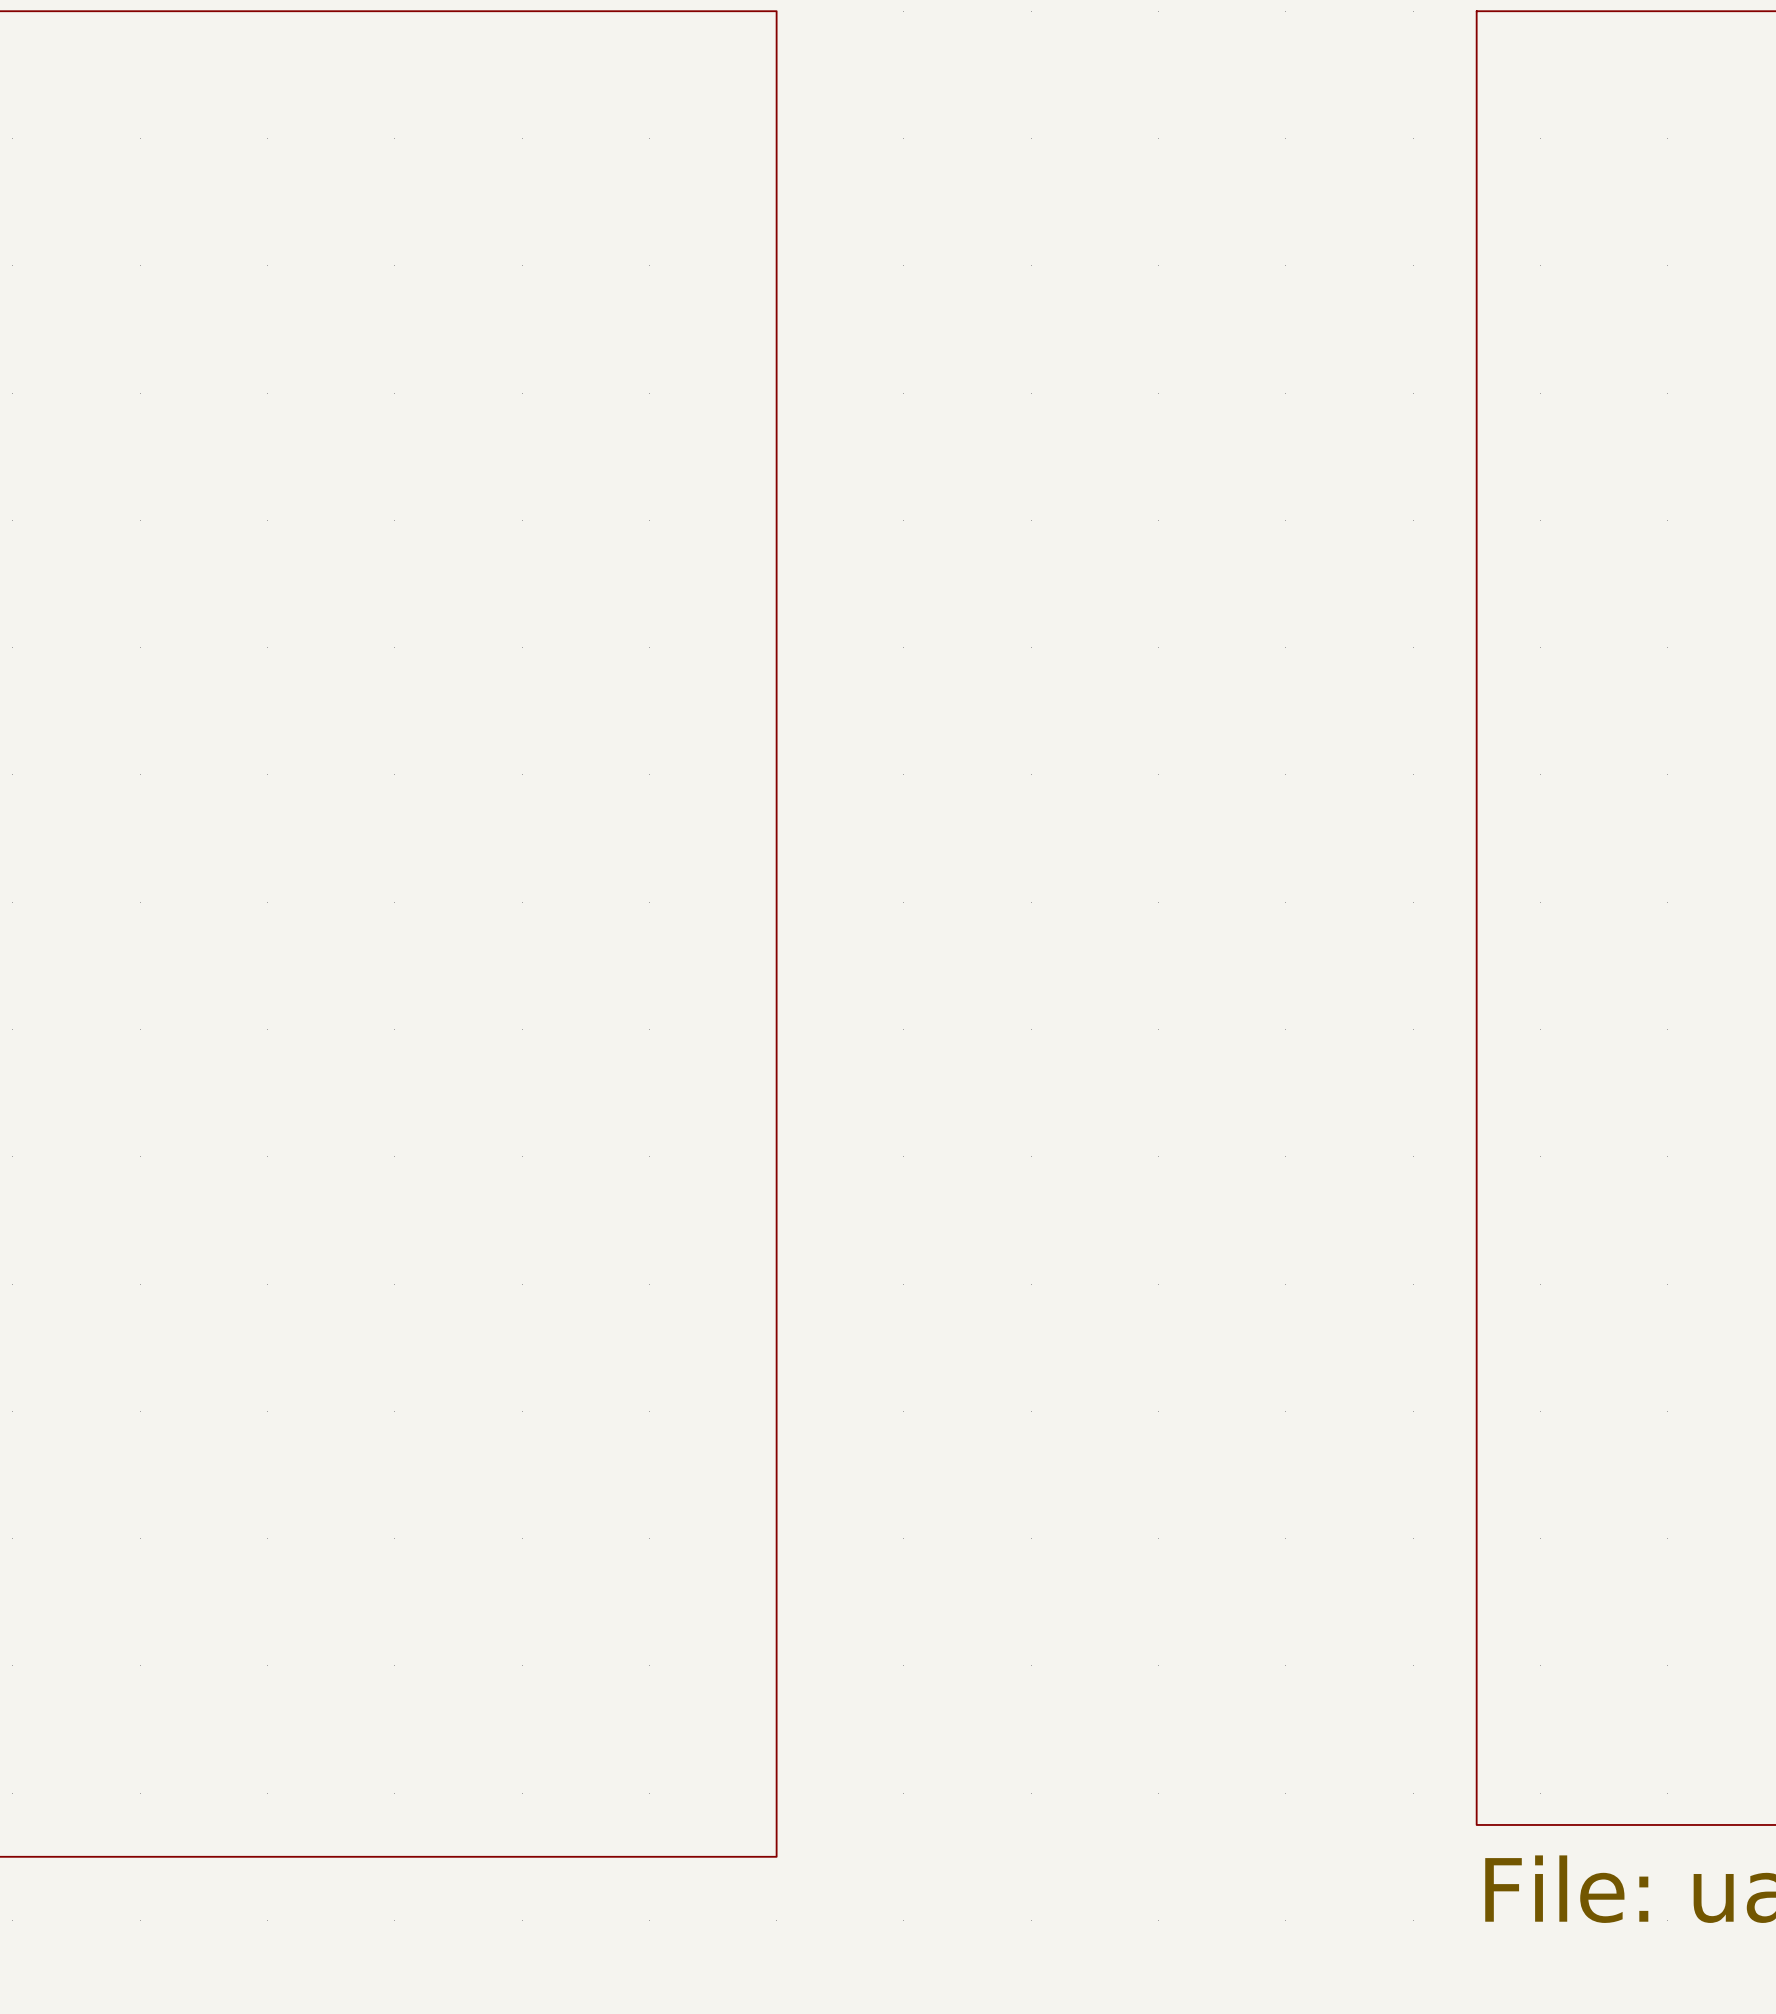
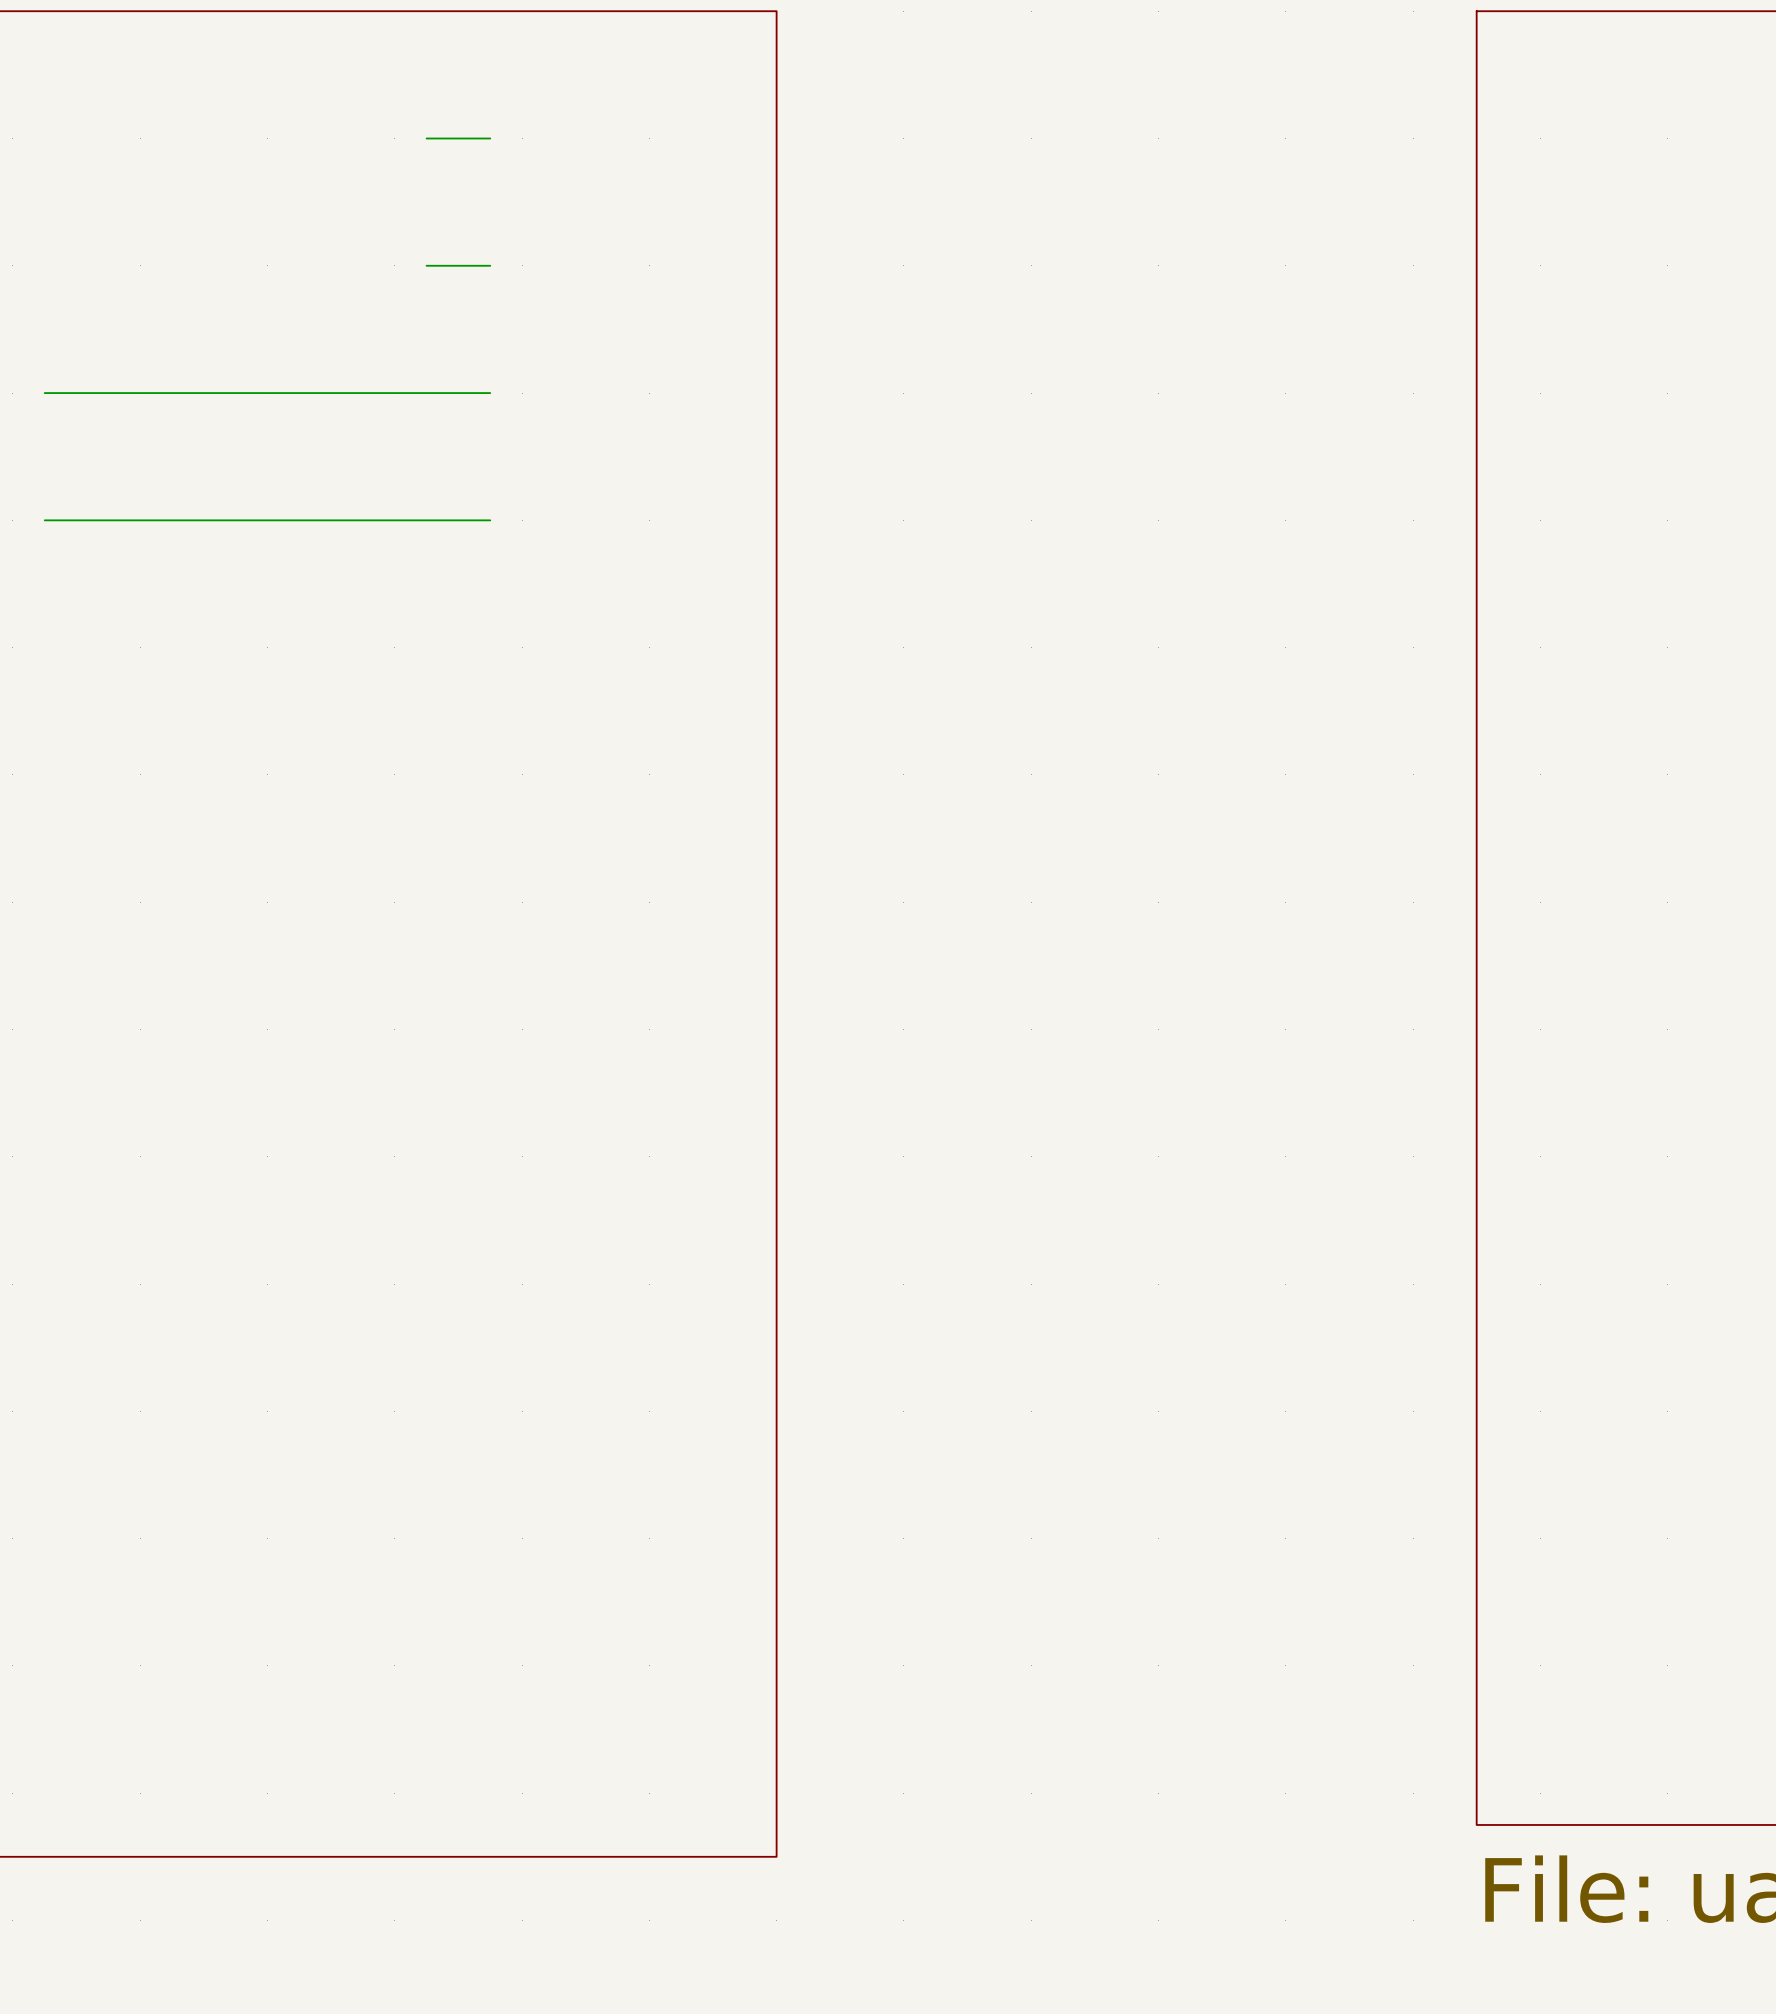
wire: none -> (426, 138) (490, 138)
wire: none -> (426, 265) (490, 265)
wire: none -> (44, 393) (490, 393)
wire: none -> (44, 520) (490, 520)

